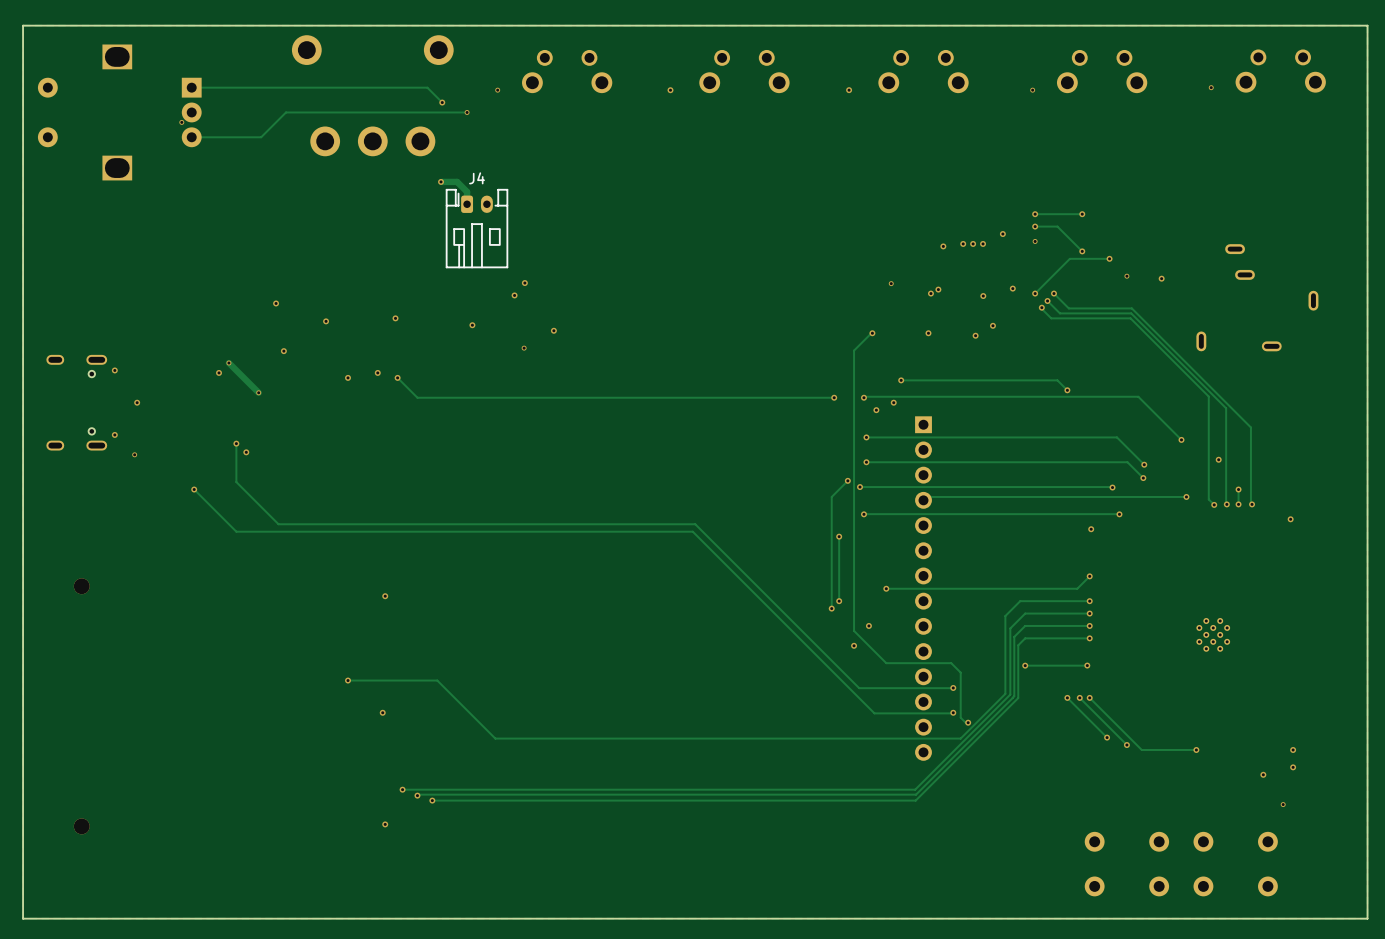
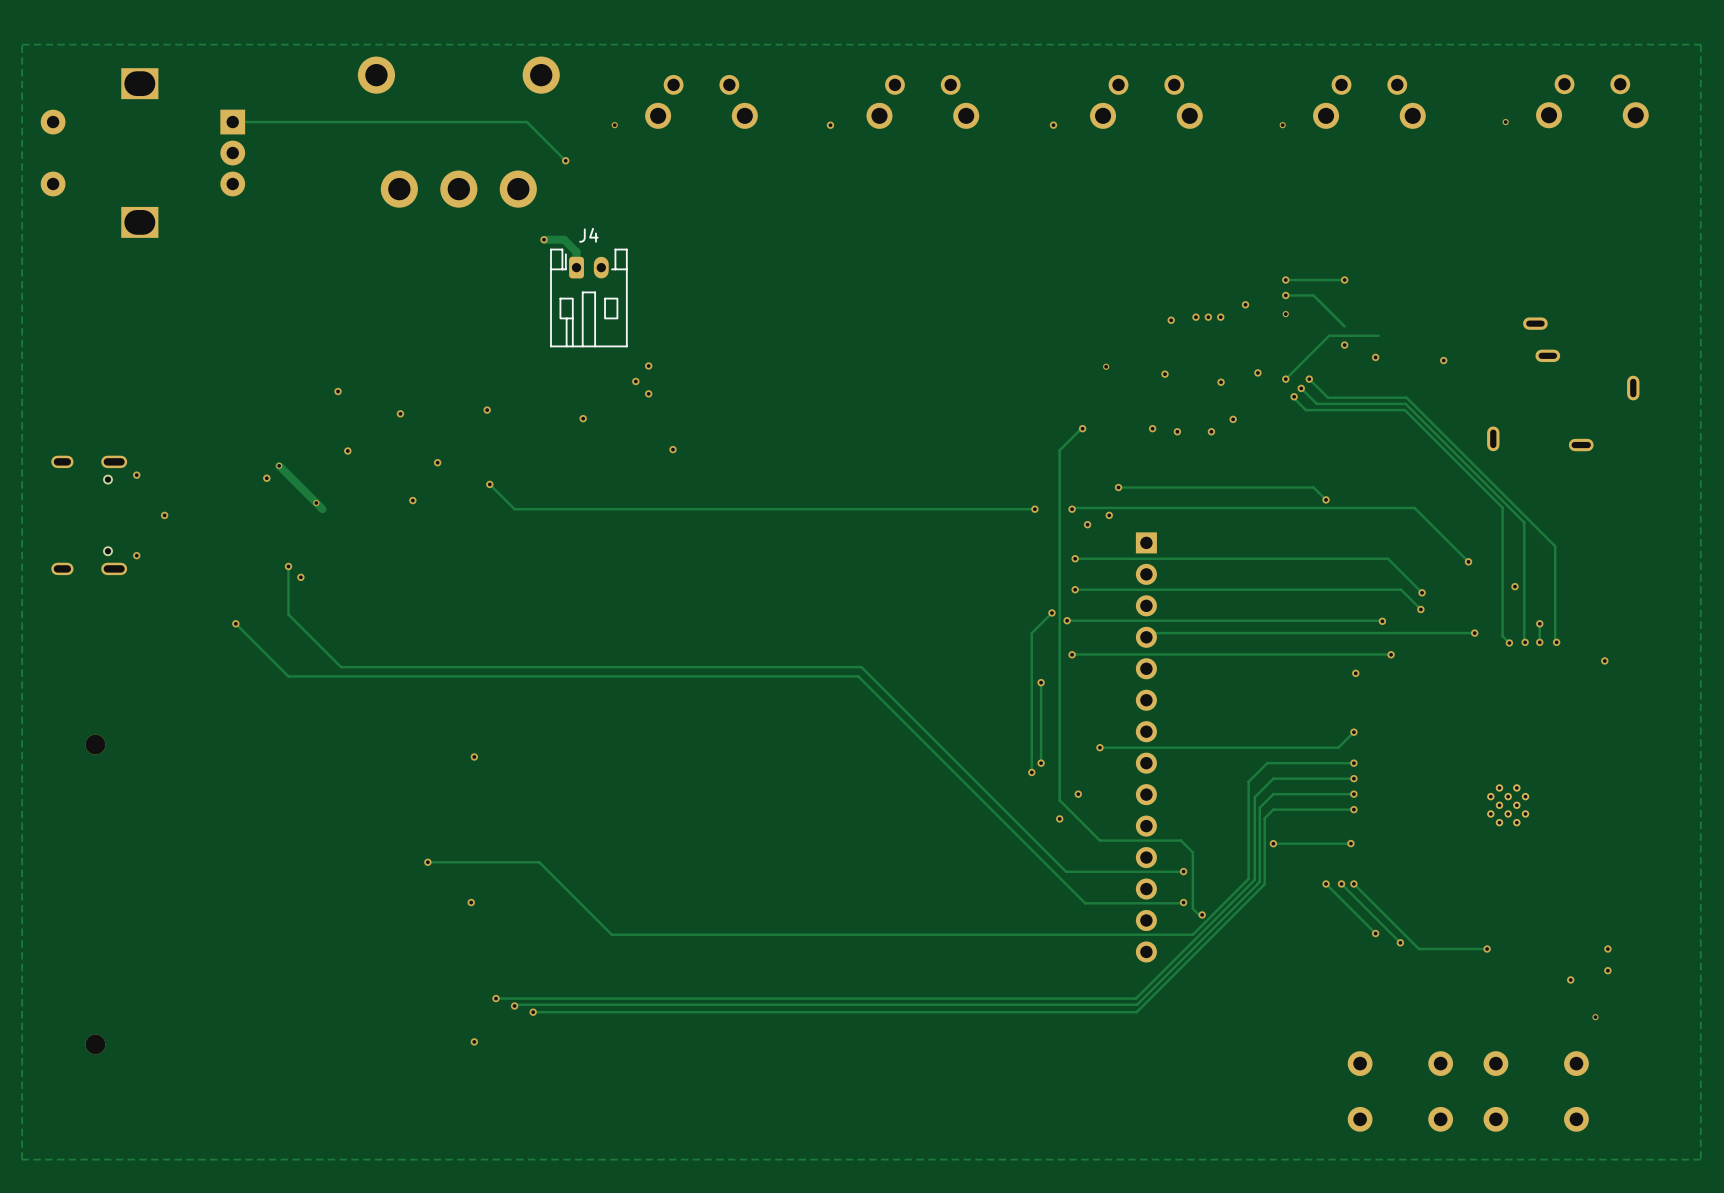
board edge: (1367, 25) (23, 25) (23, 918) (1367, 918) (1367, 25) -> none
track: none -> (545, 140) (565, 160)
via position: (442, 102) -> (565, 160)
track: (467, 112) (285, 112) (261, 137) (191, 137) -> none
via: (467, 112) -> none
via: (181, 122) -> none
via: (1082, 251) -> none
via: (1109, 258) -> none
via: none -> (1344, 345)
via: none -> (1375, 357)
via: (1126, 276) -> none
via position: (930, 293) -> (1177, 431)
via: none -> (648, 393)
via: (553, 330) -> none
via: (524, 348) -> none
via: none -> (673, 449)
via: none -> (437, 462)
via: (377, 372) -> none
via: (348, 377) -> none
via: none -> (412, 500)
track: none -> (316, 503) (322, 509)
via: (134, 454) -> none

